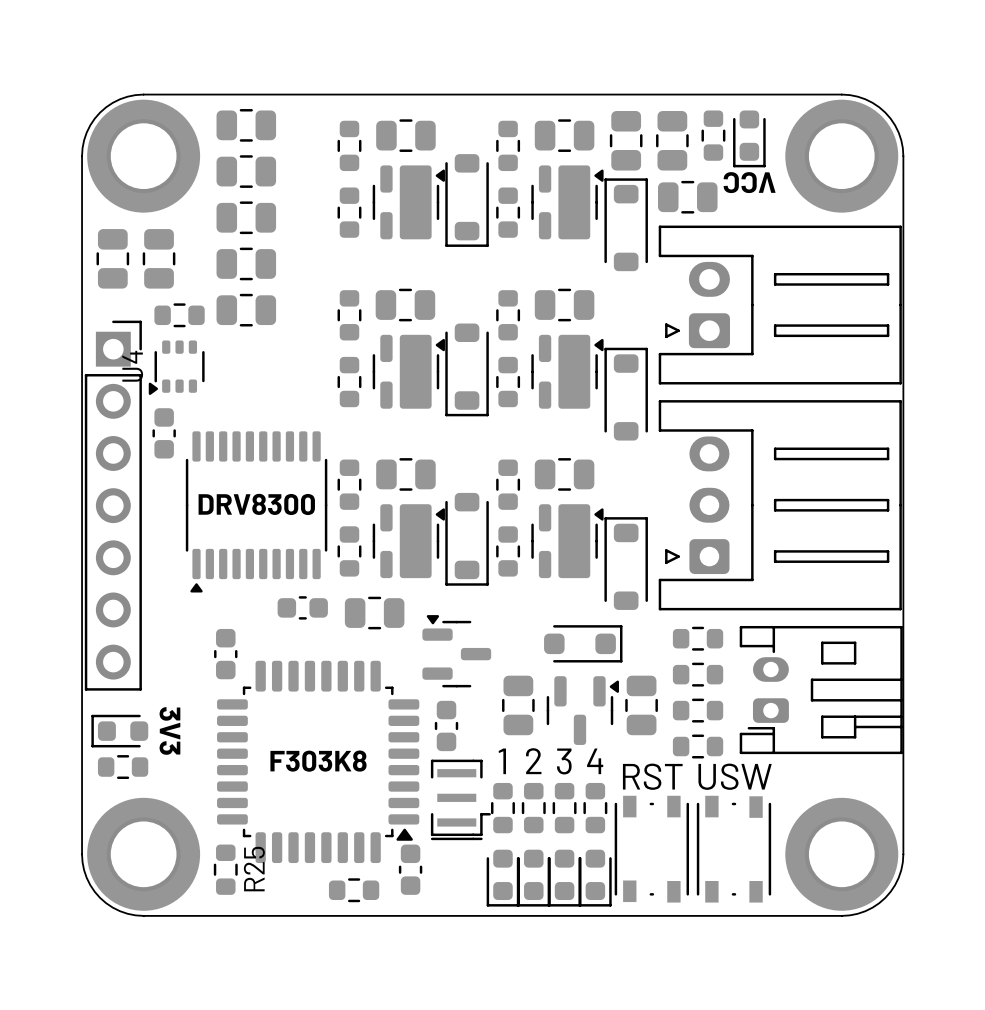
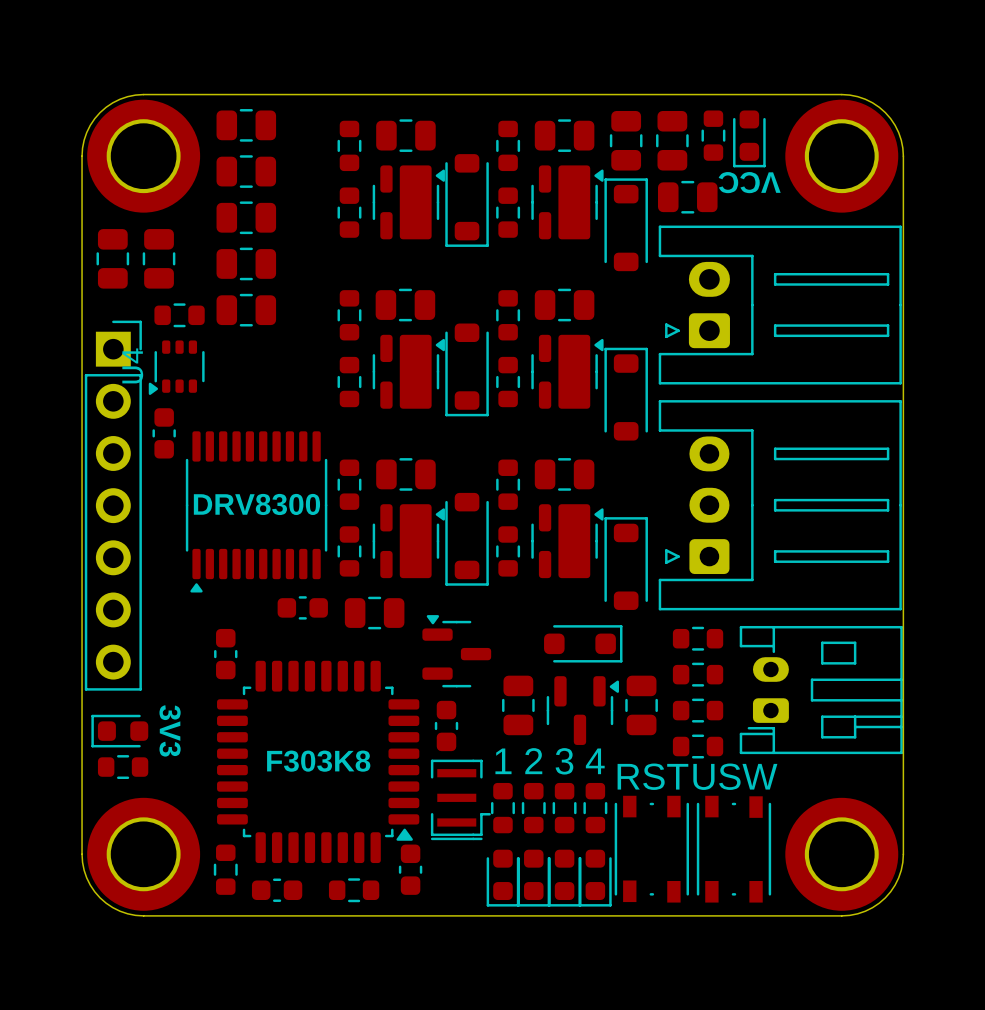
R25 name: R25 (254, 869) -> none
part: none -> (277, 890)

